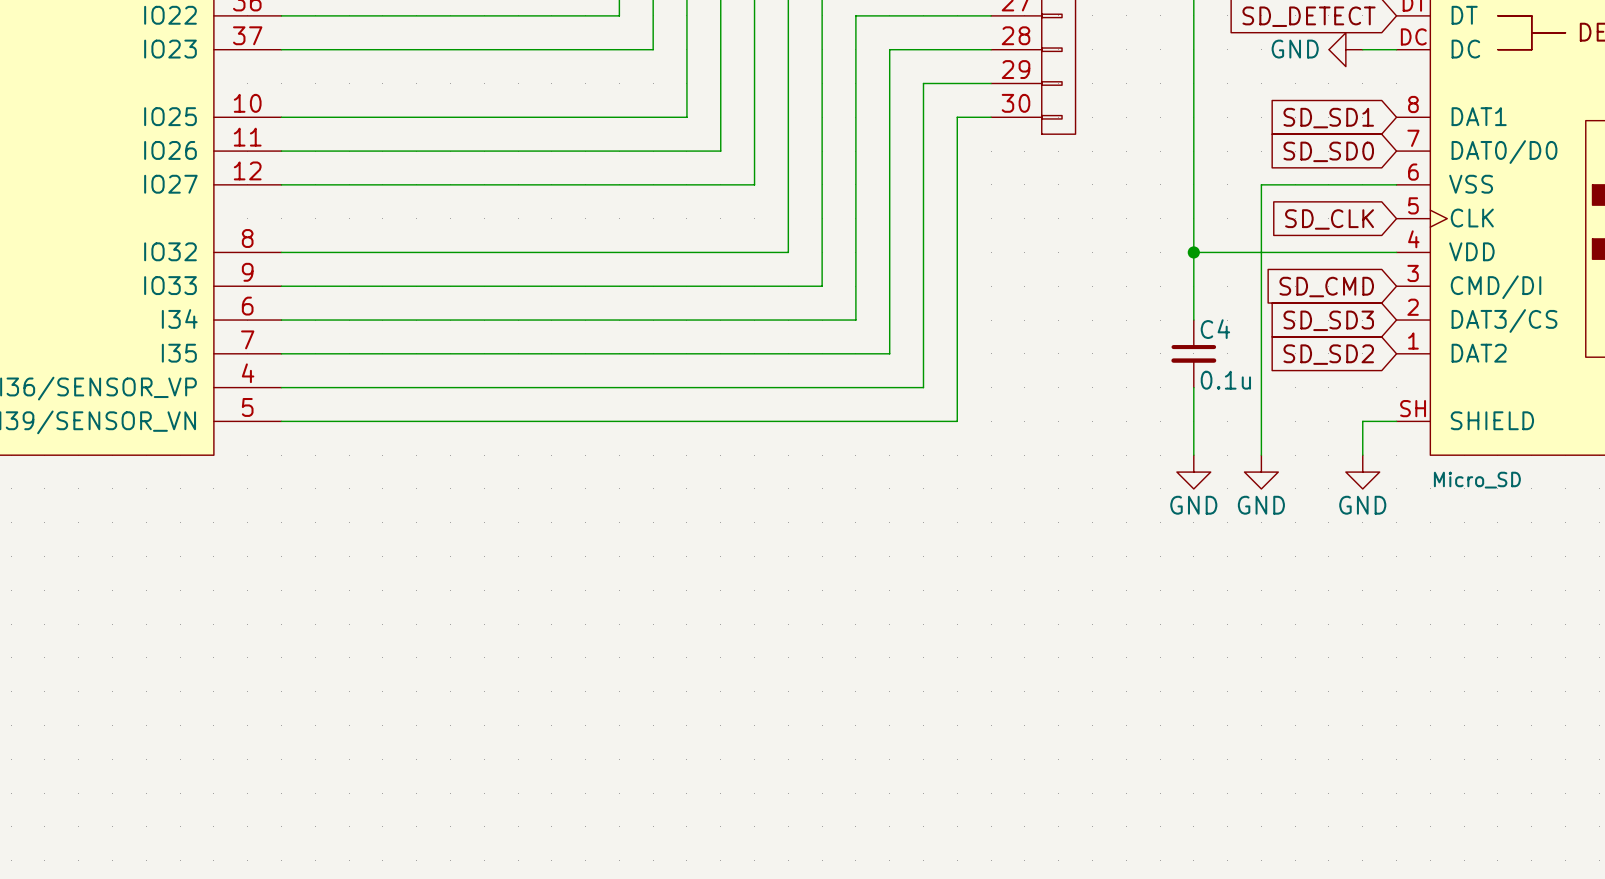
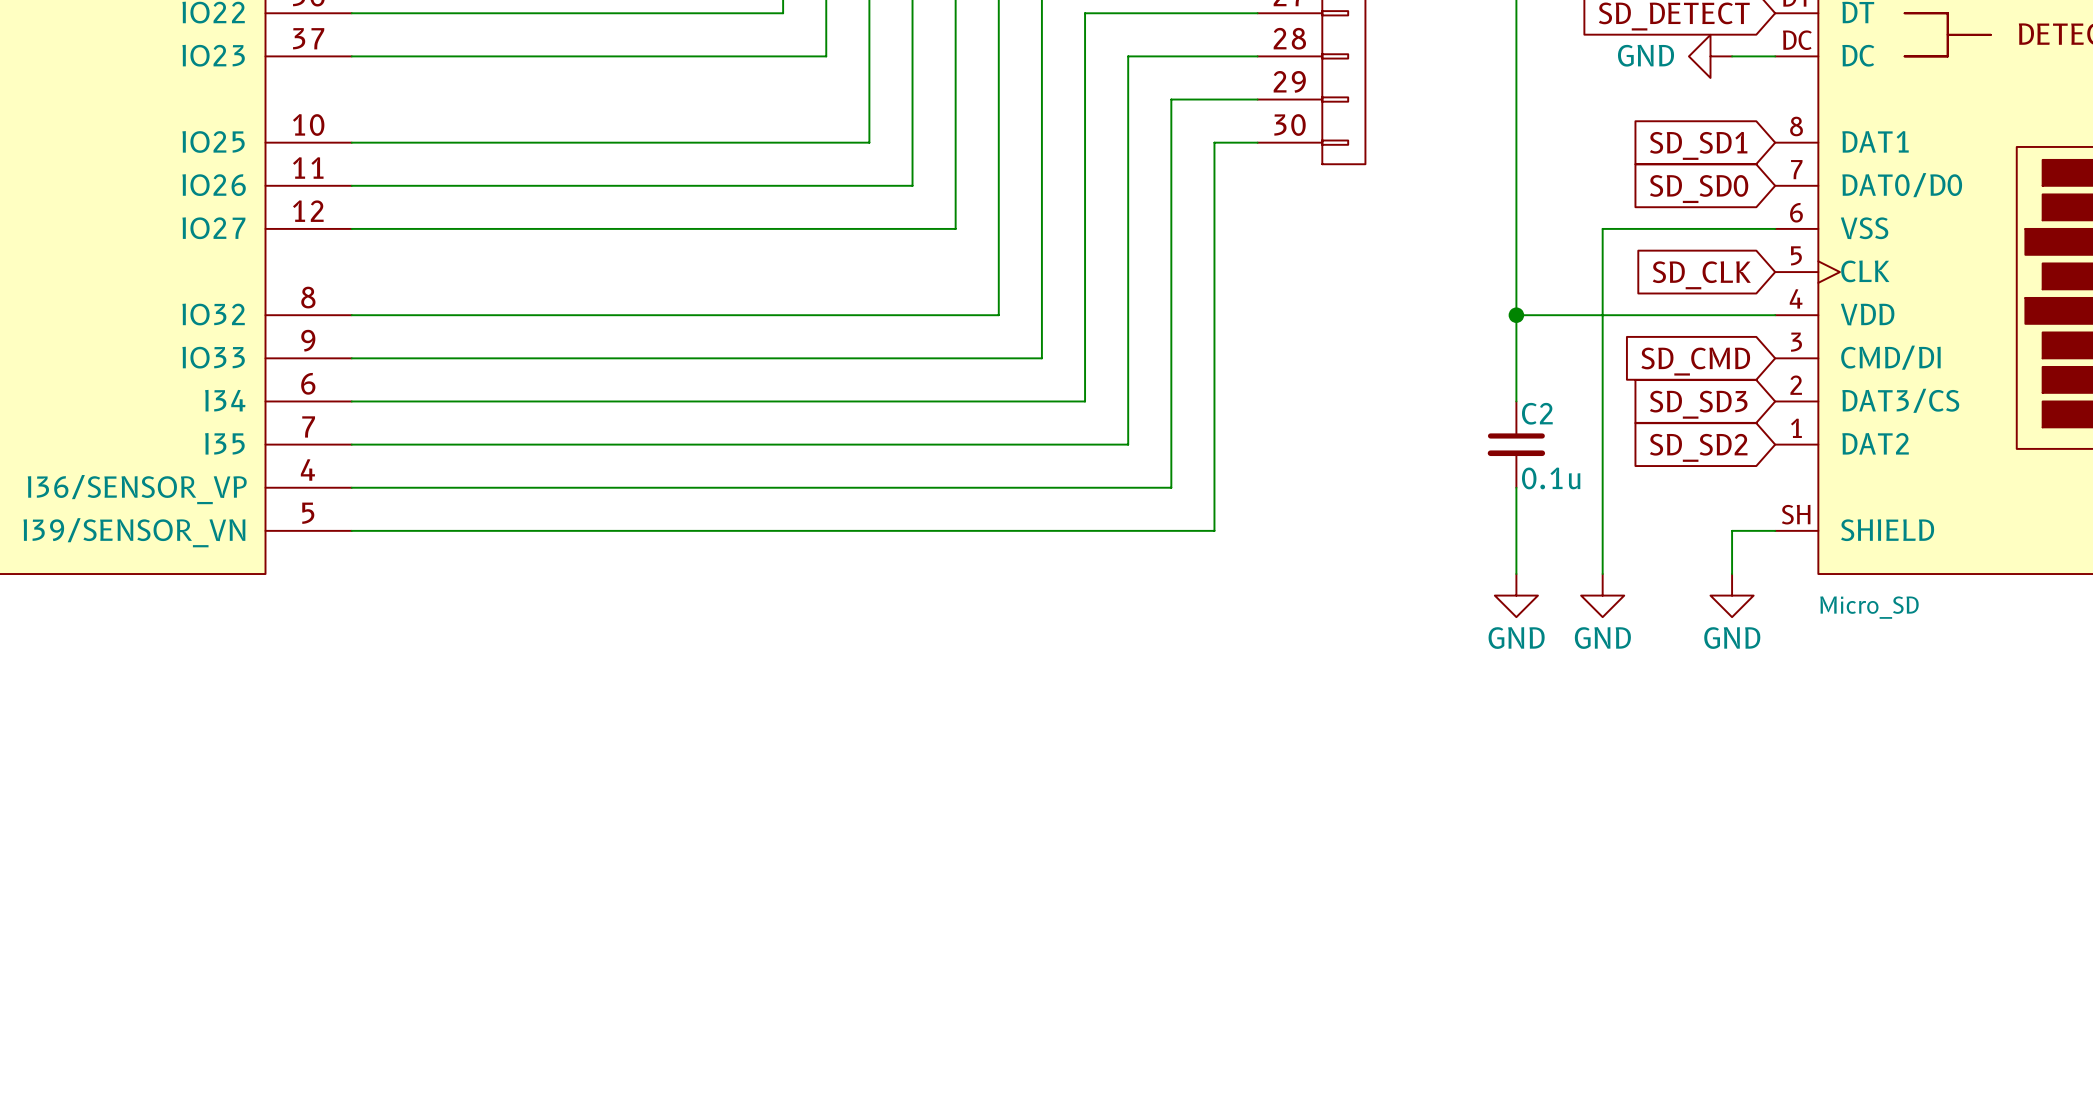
C4 name: C4 (1215, 329) -> C2 (1537, 413)

